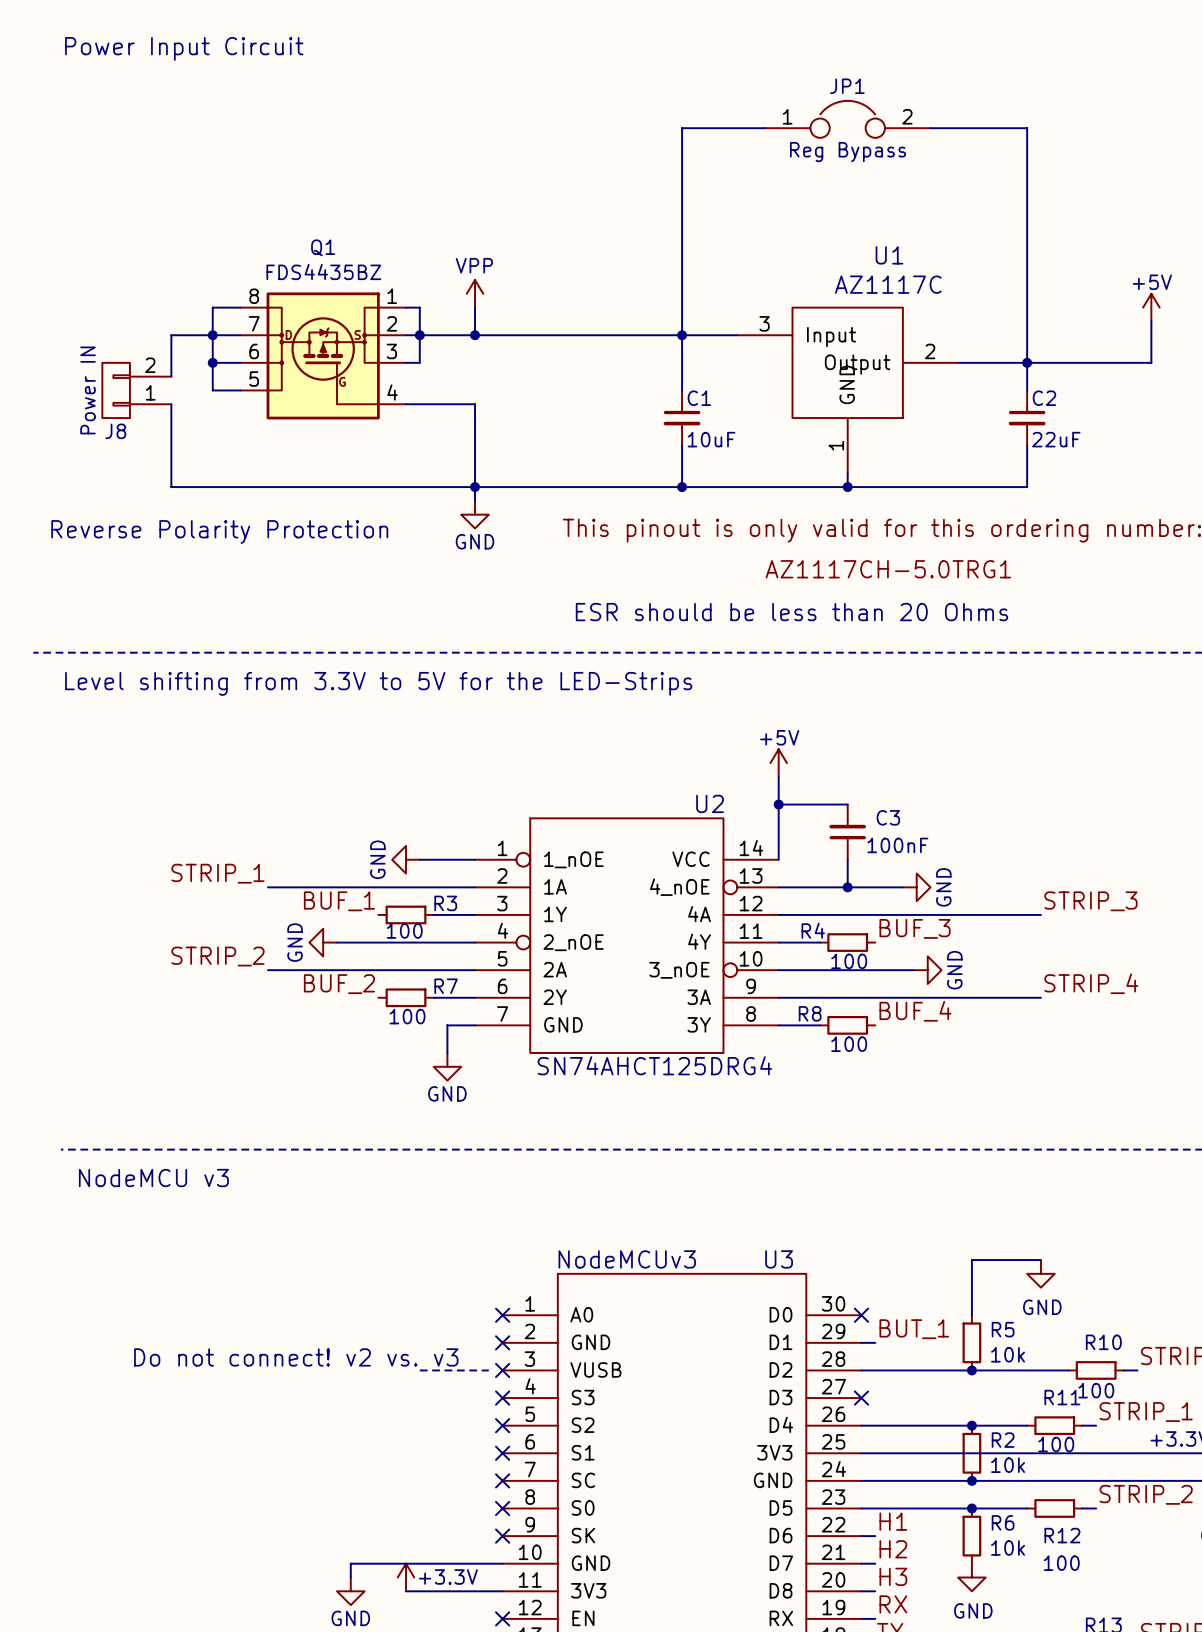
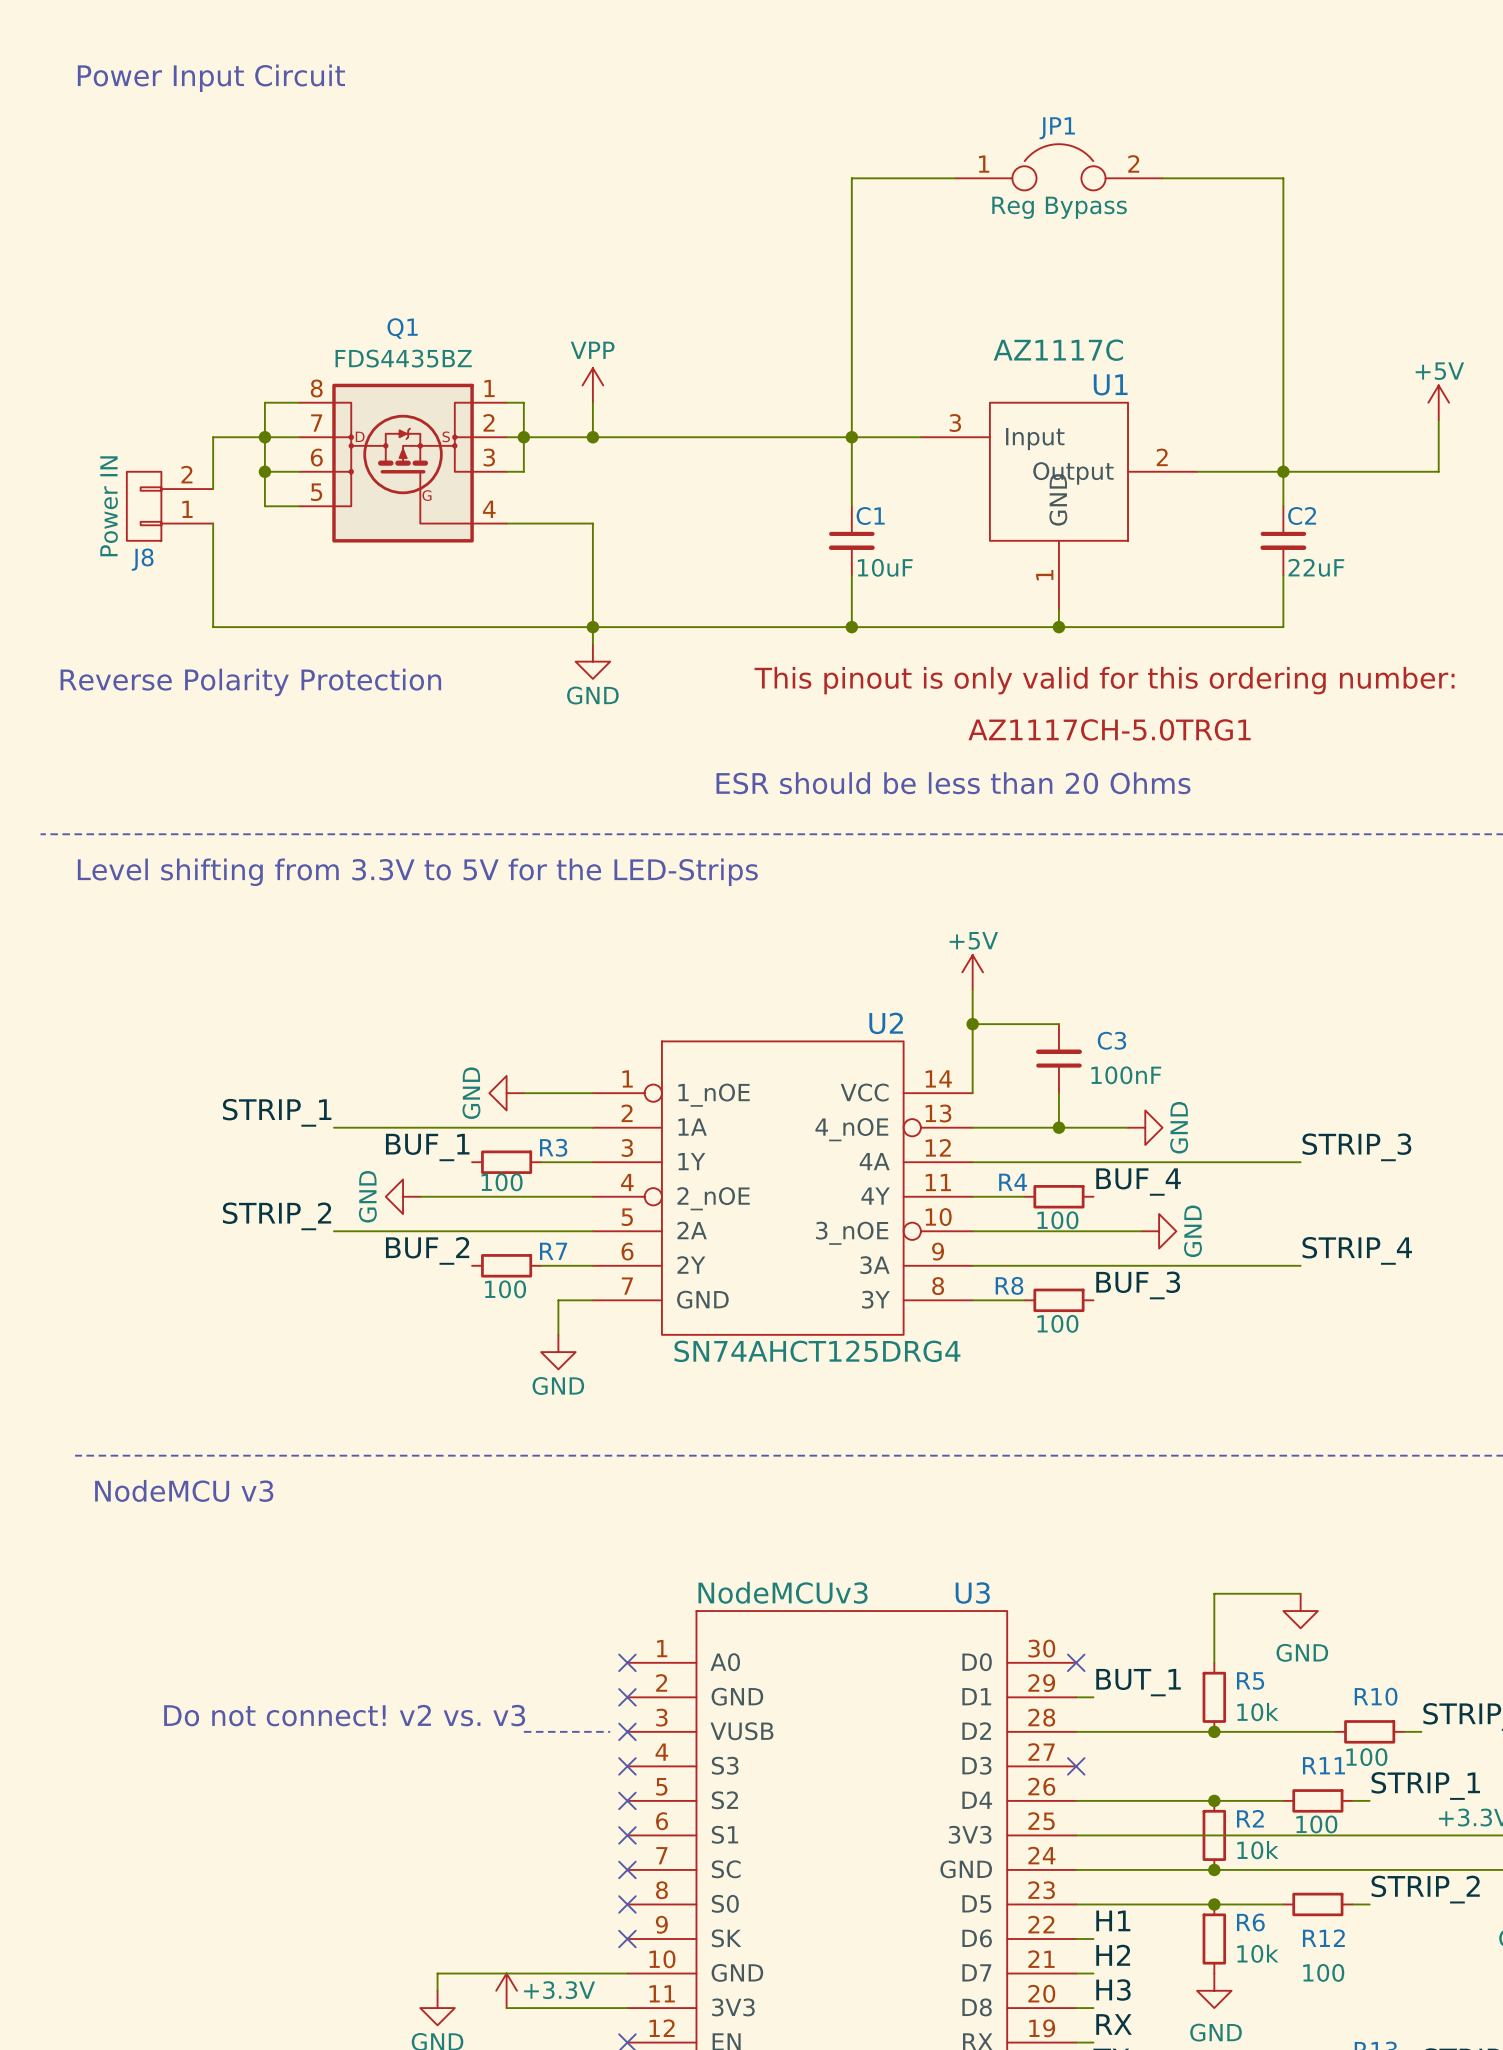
U1 name position: U1 (889, 255) -> U1 (1110, 384)
U1 value position: AZ1117C (888, 284) -> AZ1117C (1058, 350)
label: BUF_3 (915, 928) -> BUF_4 (1138, 1182)
label: BUF_4 (915, 1011) -> BUF_3 (1138, 1285)

